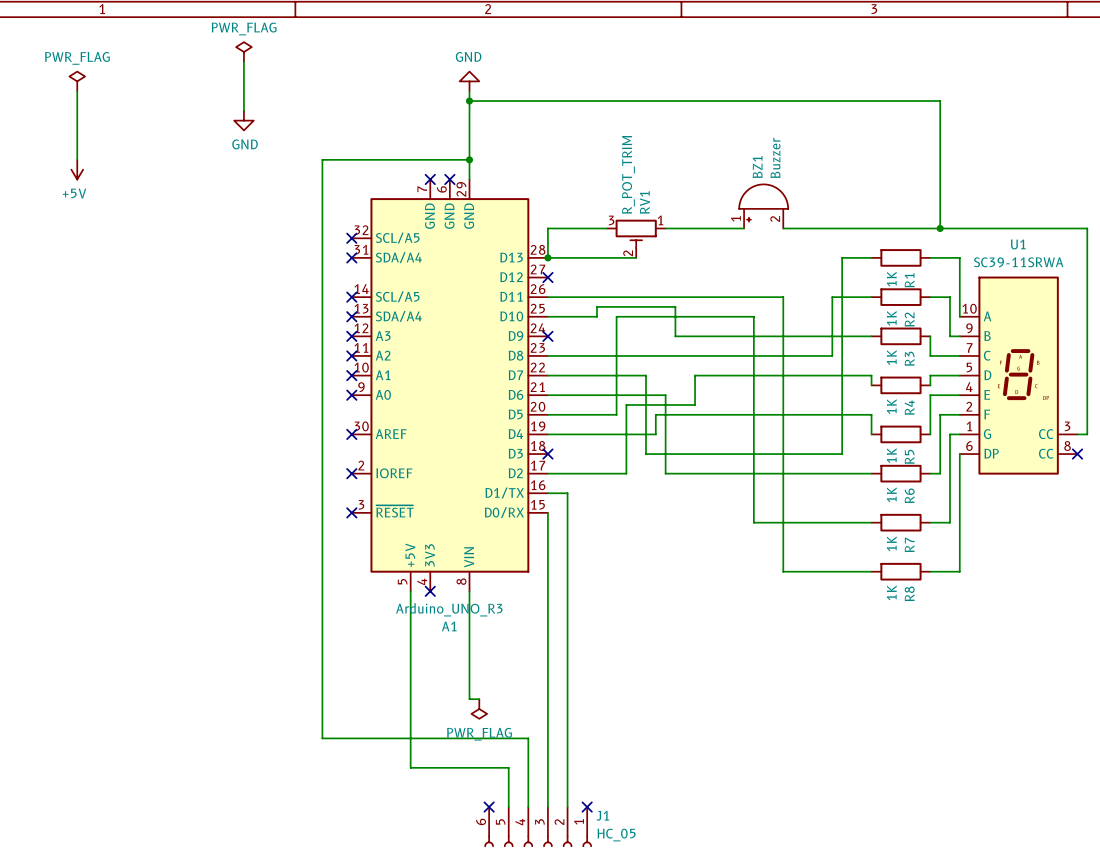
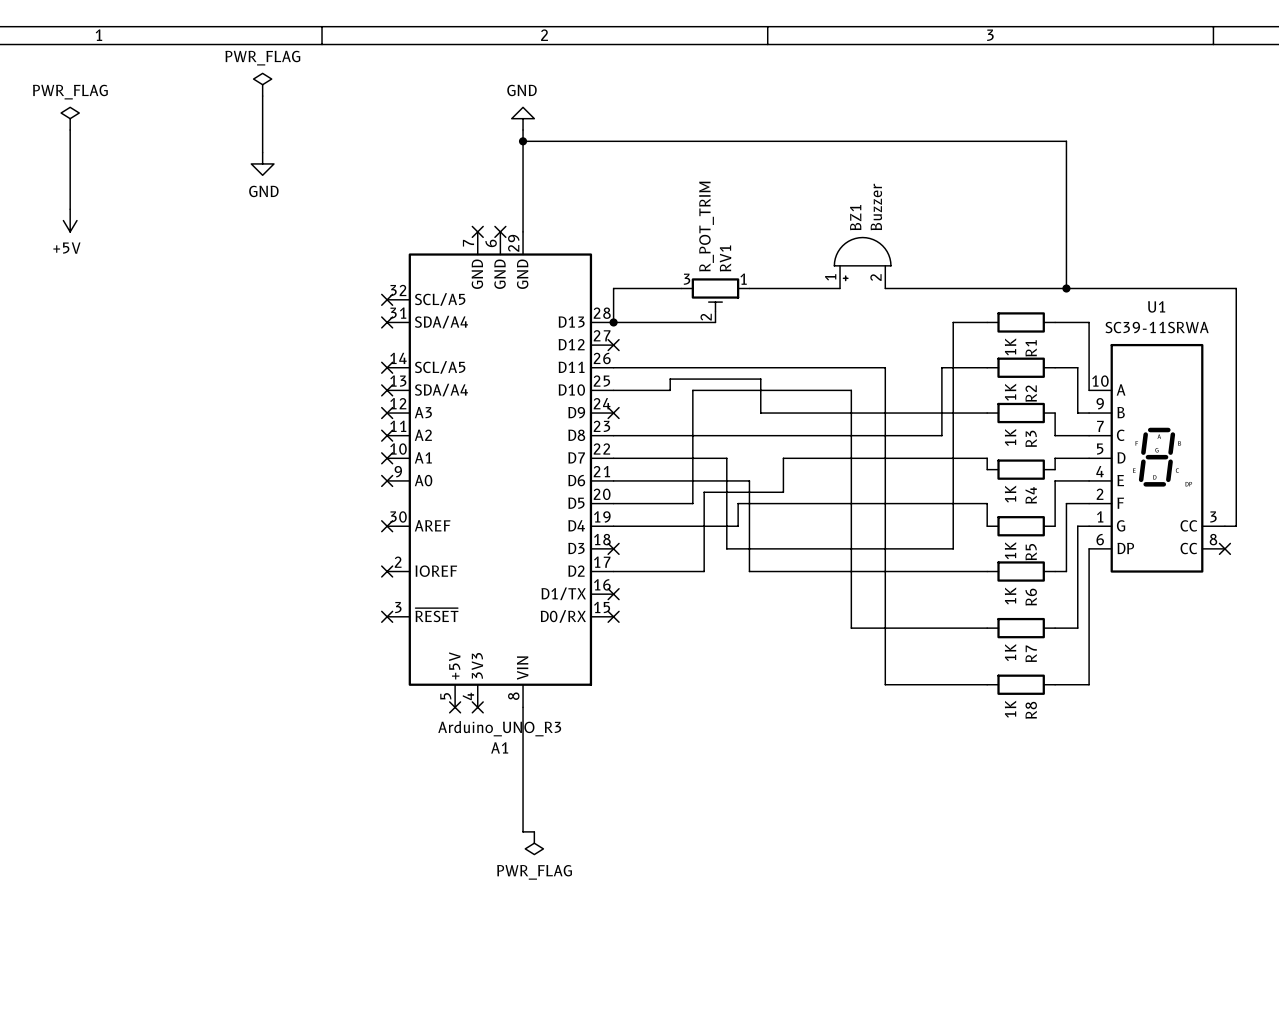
wire: (469, 159) (322, 159) (322, 738) (528, 738) (528, 807) -> none
junction: (469, 159) -> none
wire: (547, 493) (567, 493) (567, 807) -> none
no-connect mark: none -> (613, 594)
wire: (547, 512) (547, 807) -> none
no-connect mark: none -> (613, 616)
wire: (410, 591) (410, 767) (508, 767) (508, 807) -> none
no-connect mark: none -> (455, 707)
no-connect mark: (489, 807) -> none
no-connect mark: (587, 807) -> none
J1: HC_05 (538, 826) -> none

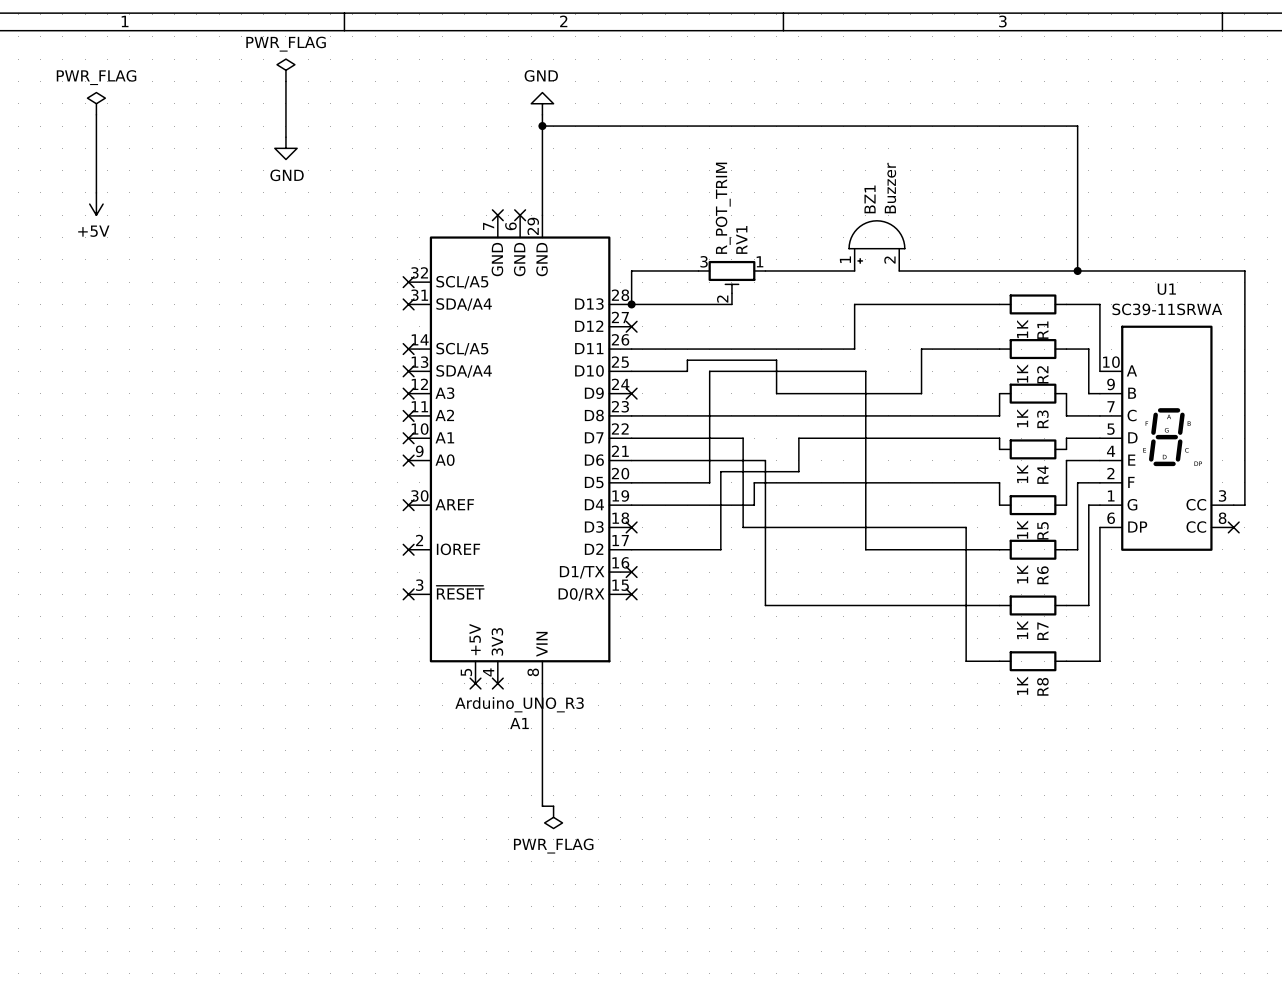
wire: (953, 322) (953, 548) -> (966, 304) (854, 304) (854, 349)
wire: (840, 367) (885, 367) (885, 684) (953, 684) -> (966, 527) (966, 661)
wire: (941, 367) (941, 435) -> (954, 349) (921, 349) (921, 393)
wire: (907, 413) (987, 413) -> (954, 415) (999, 415) (999, 393)
wire: (749, 571) (851, 571) (851, 628) -> (765, 549) (765, 605) (865, 605)

